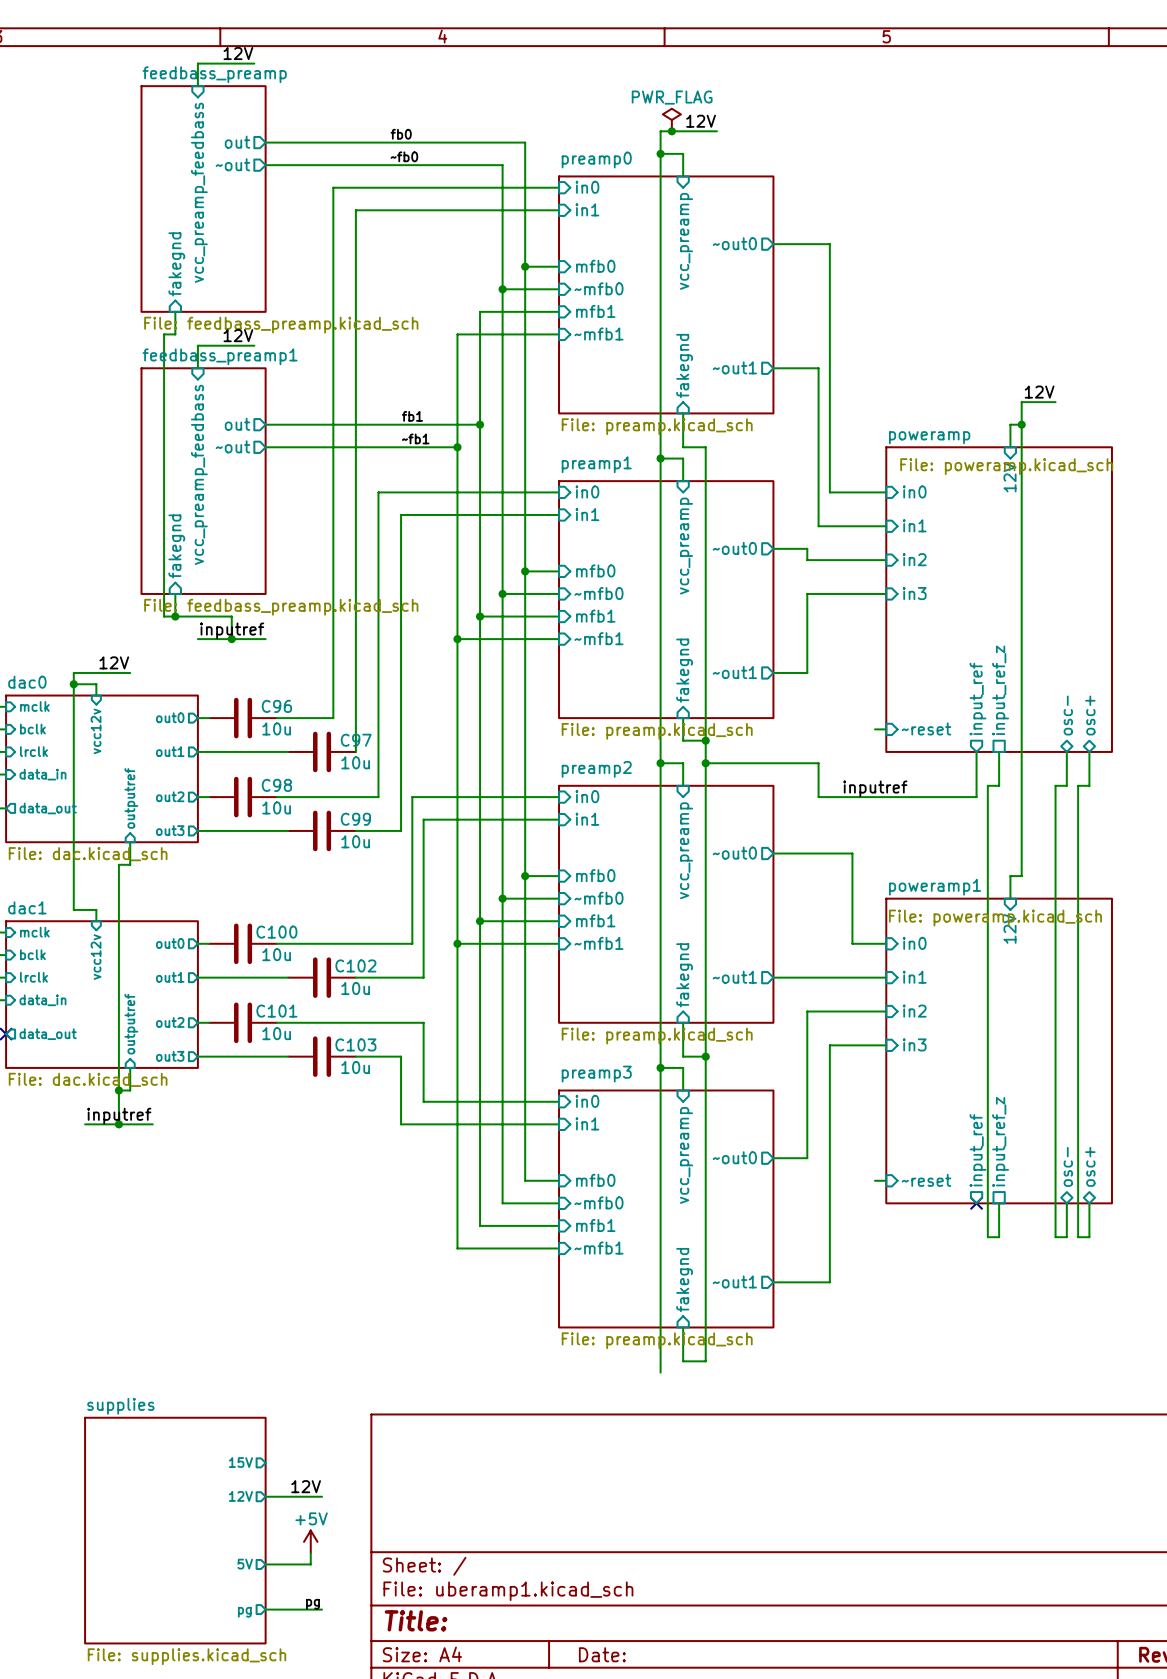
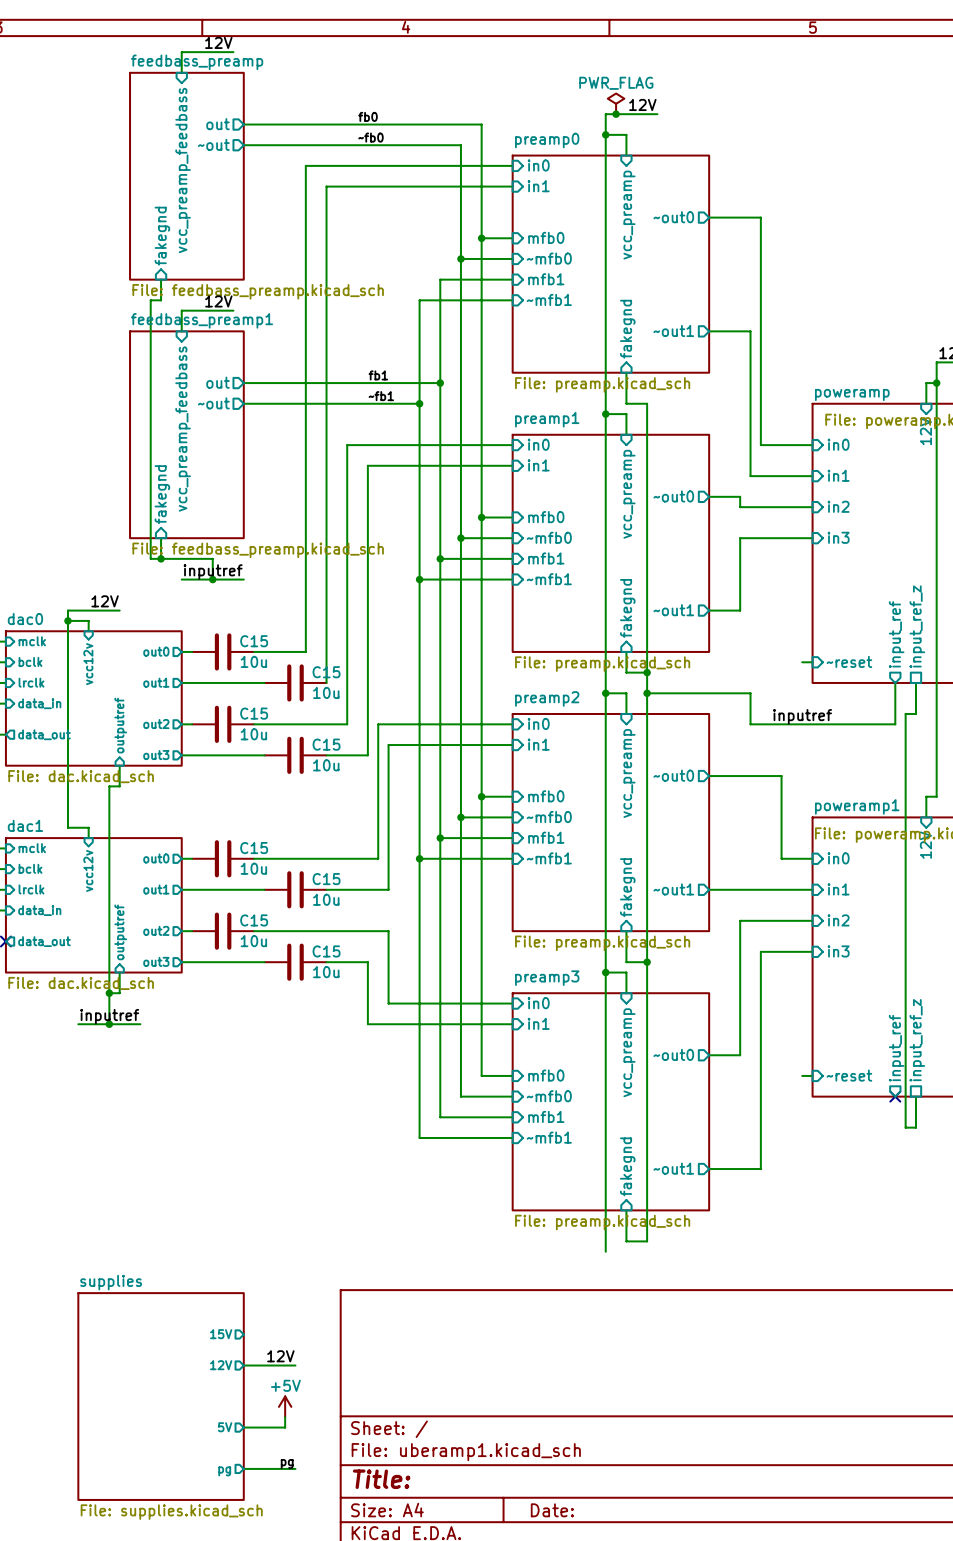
C96 name: C96 (276, 706) -> C15 (254, 641)
C97 name: C97 (356, 740) -> C15 (326, 672)
C98 name: C98 (276, 785) -> C15 (254, 713)
C99 name: C99 (355, 819) -> C15 (326, 744)
C100 name: C100 (276, 932) -> C15 (254, 848)
C102 name: C102 (355, 965) -> C15 (326, 879)
C101 name: C101 (276, 1011) -> C15 (254, 920)
C103 name: C103 (355, 1044) -> C15 (326, 951)

